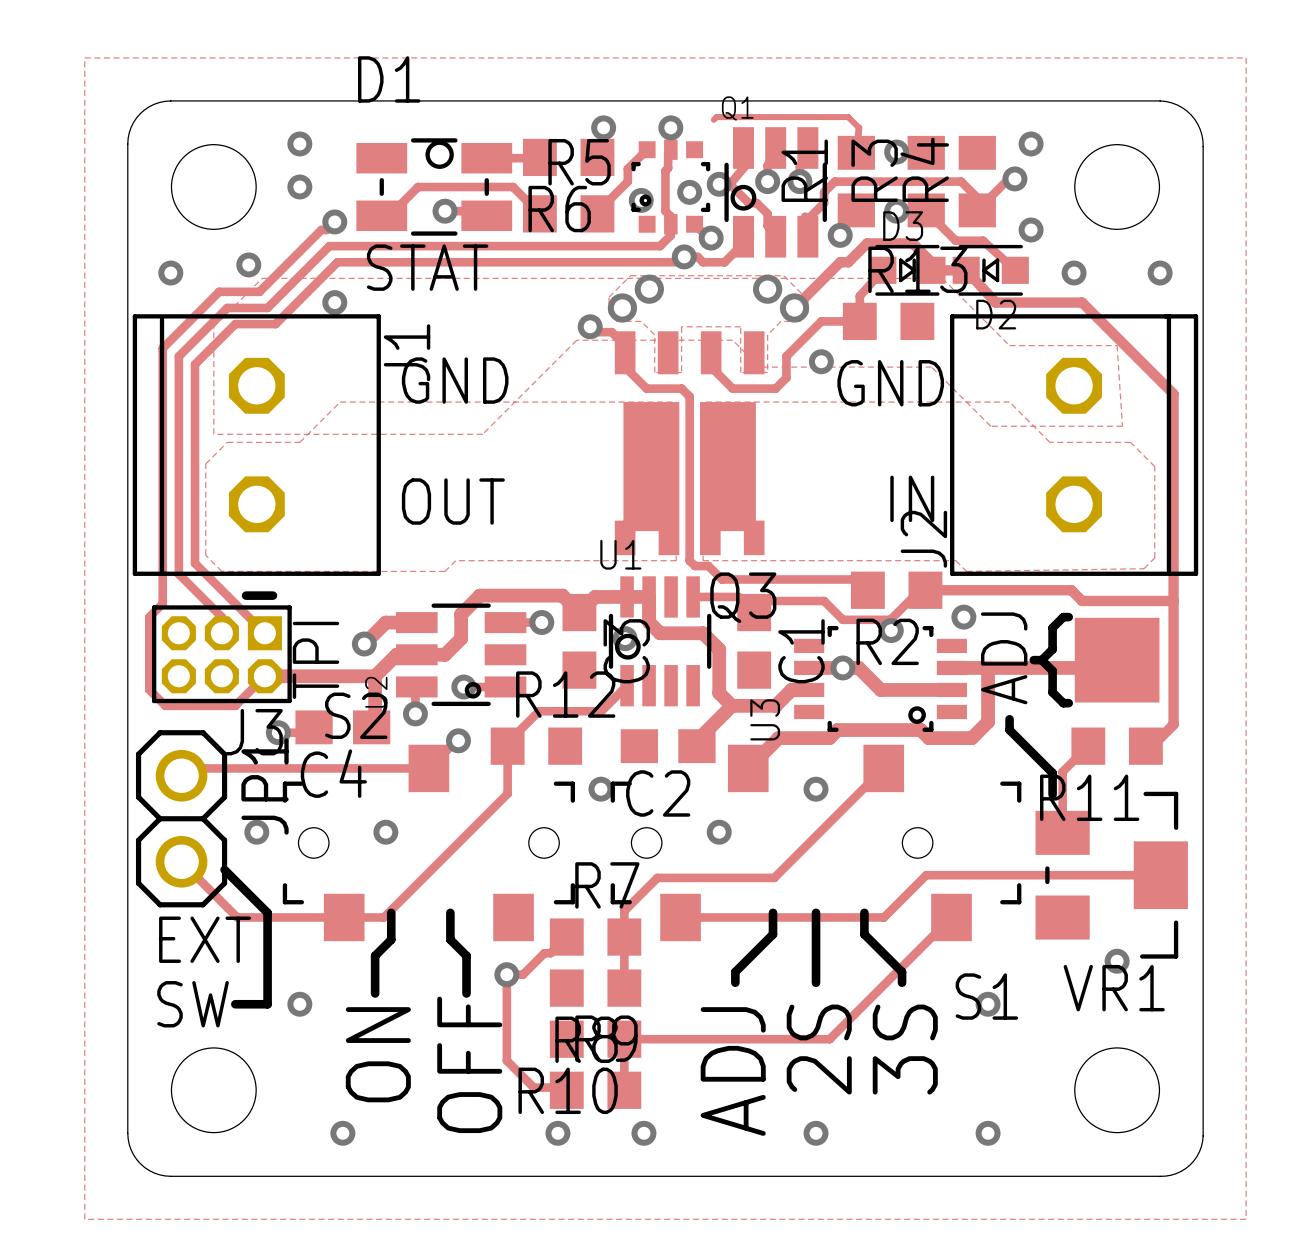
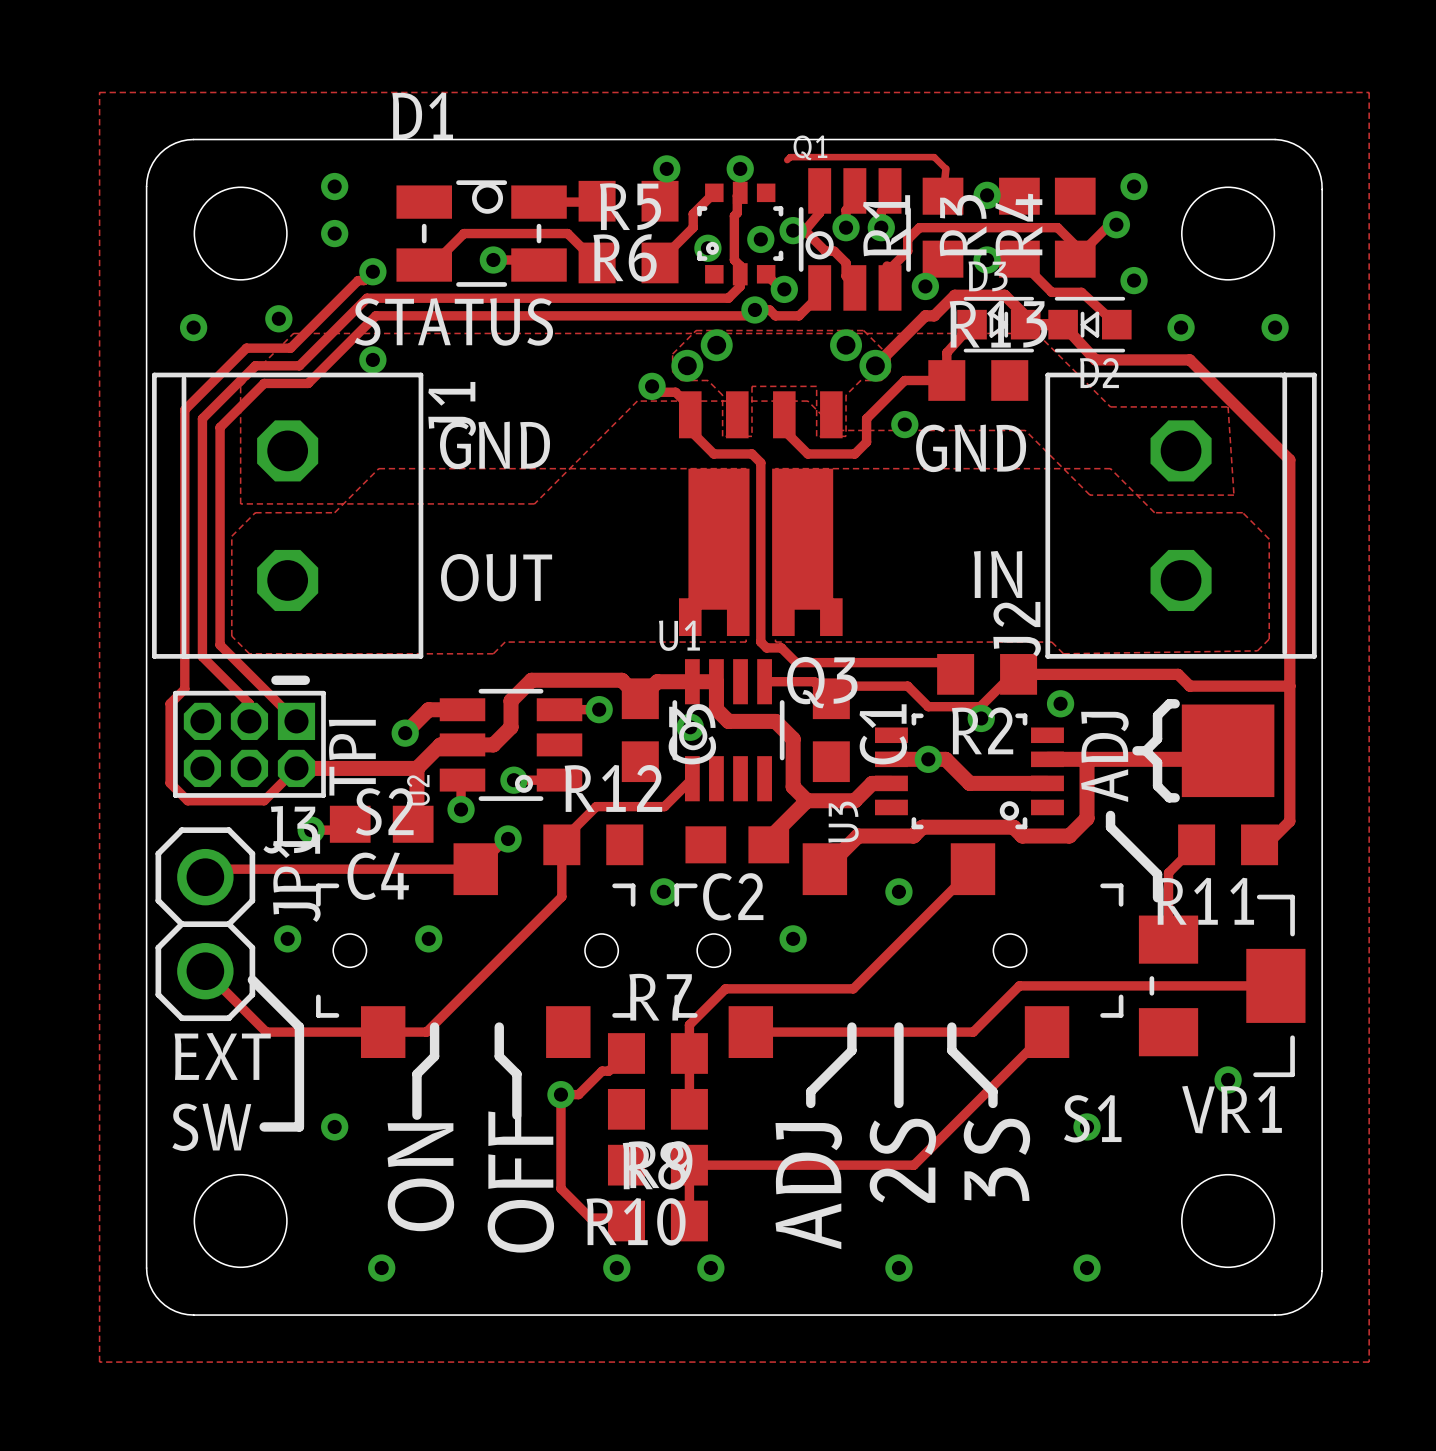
text: STAT (427, 267) -> STATUS (453, 321)

